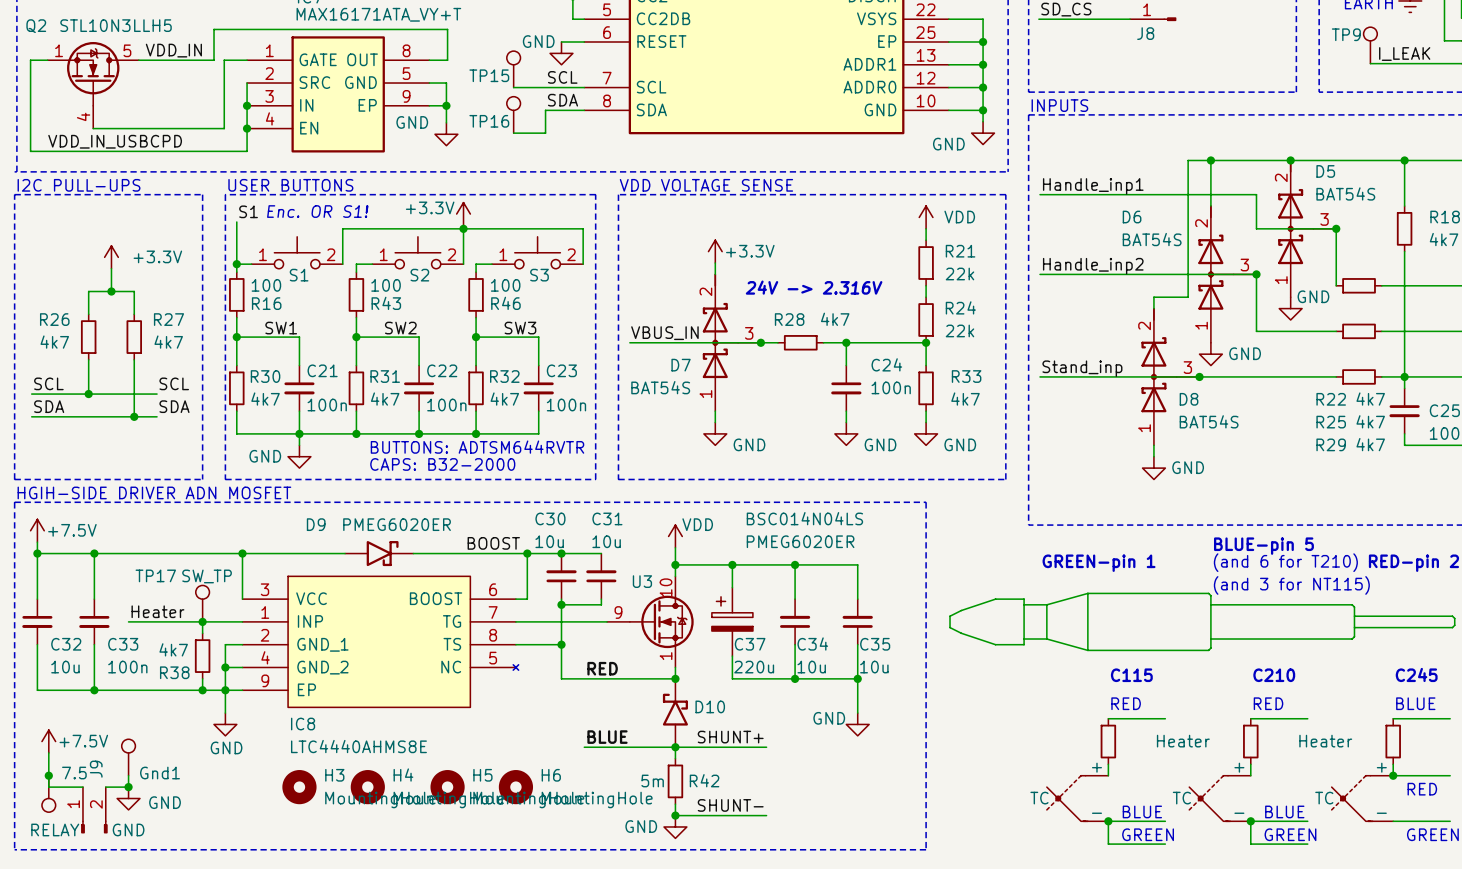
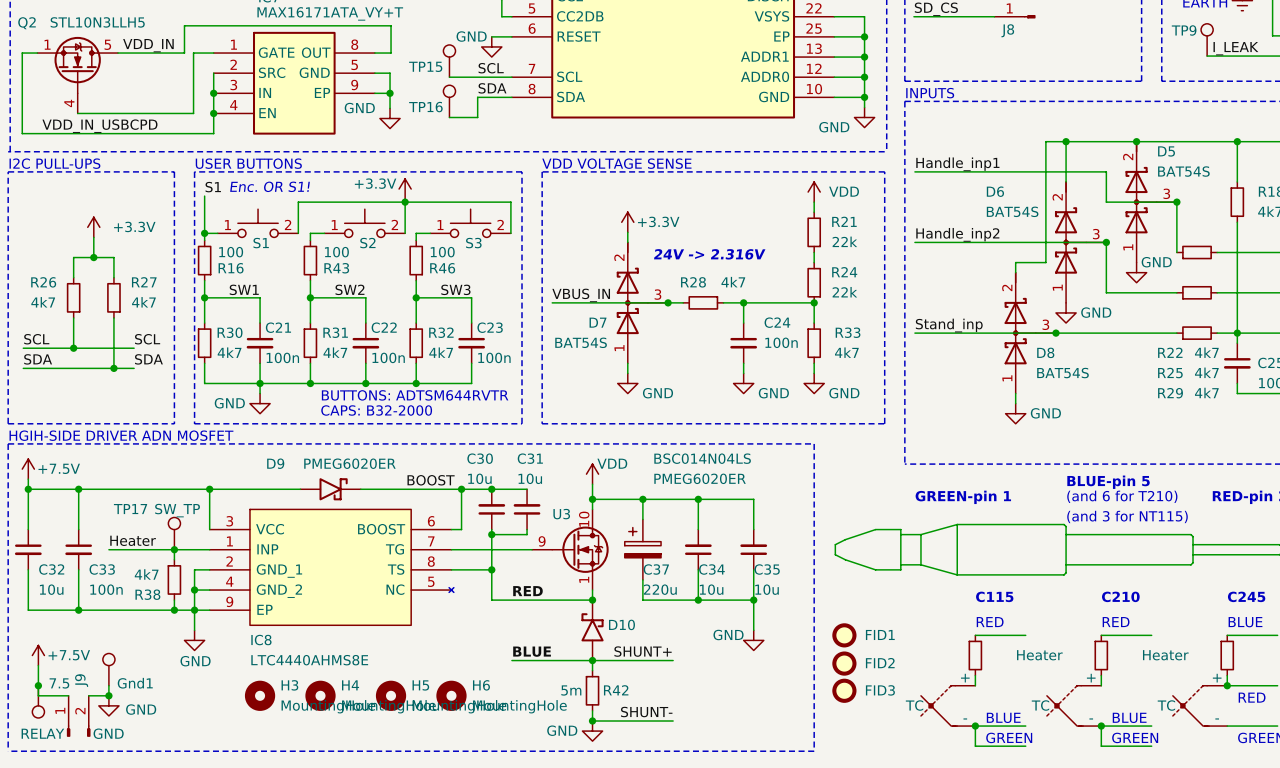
FID1: none -> (844, 635)
FID2: none -> (844, 663)
FID3: none -> (844, 690)

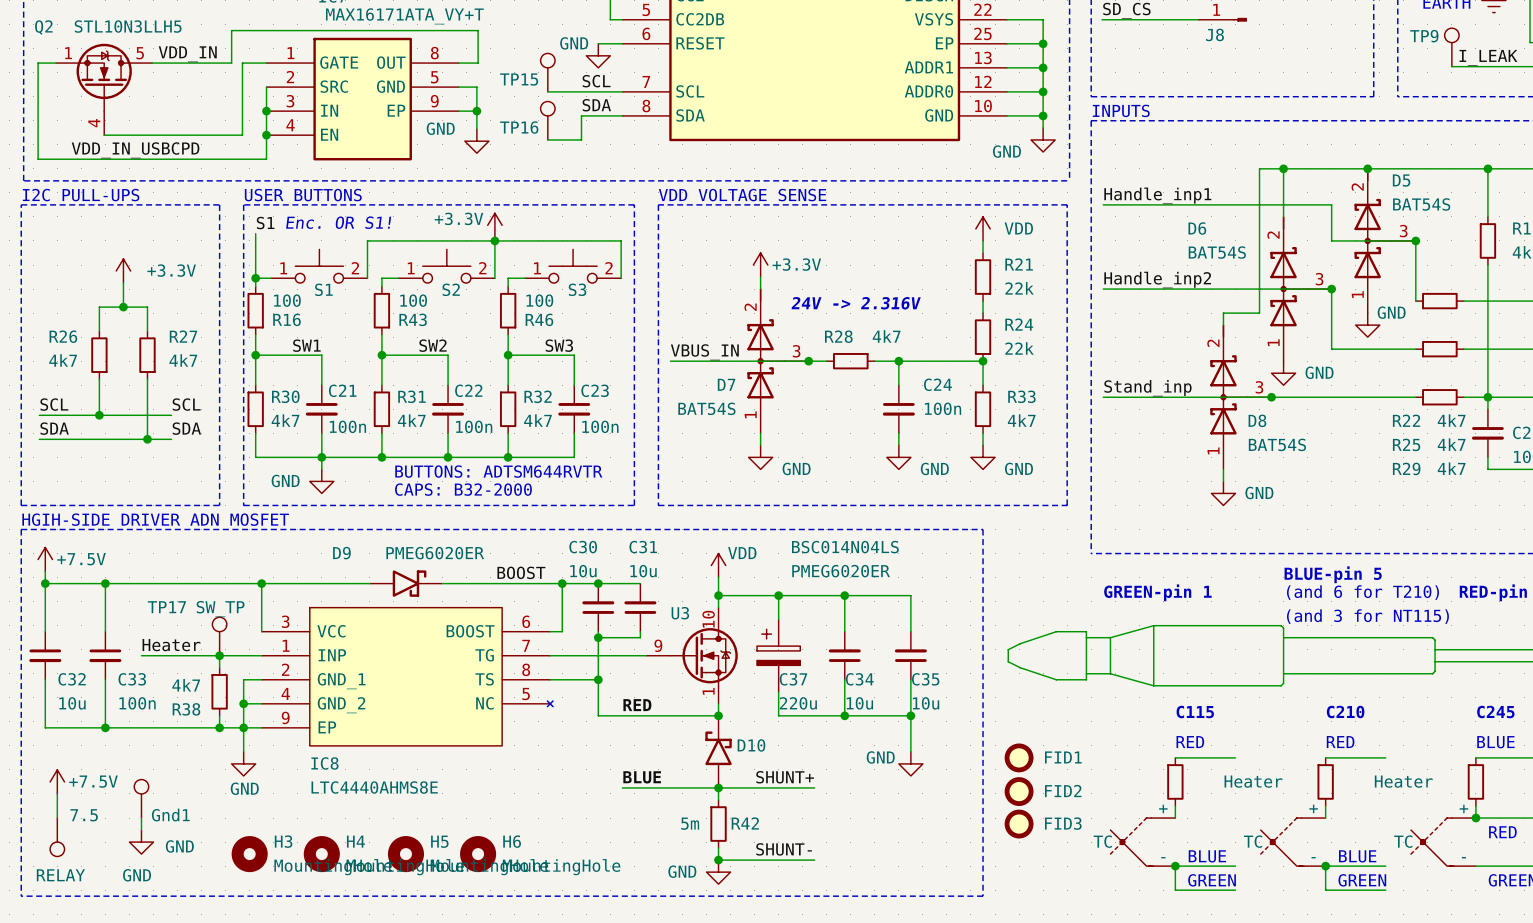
wire: (38, 685) (38, 695) (68, 695) -> none
junction: (38, 685) -> none
wire: (88, 695) (108, 695) -> none
junction: (108, 695) -> none
H3 position: (260, 695) -> (249, 854)
H4 position: (320, 695) -> (321, 854)
H5 position: (391, 695) -> (405, 854)
H6 position: (451, 695) -> (478, 854)
J9: (78, 716) -> none

